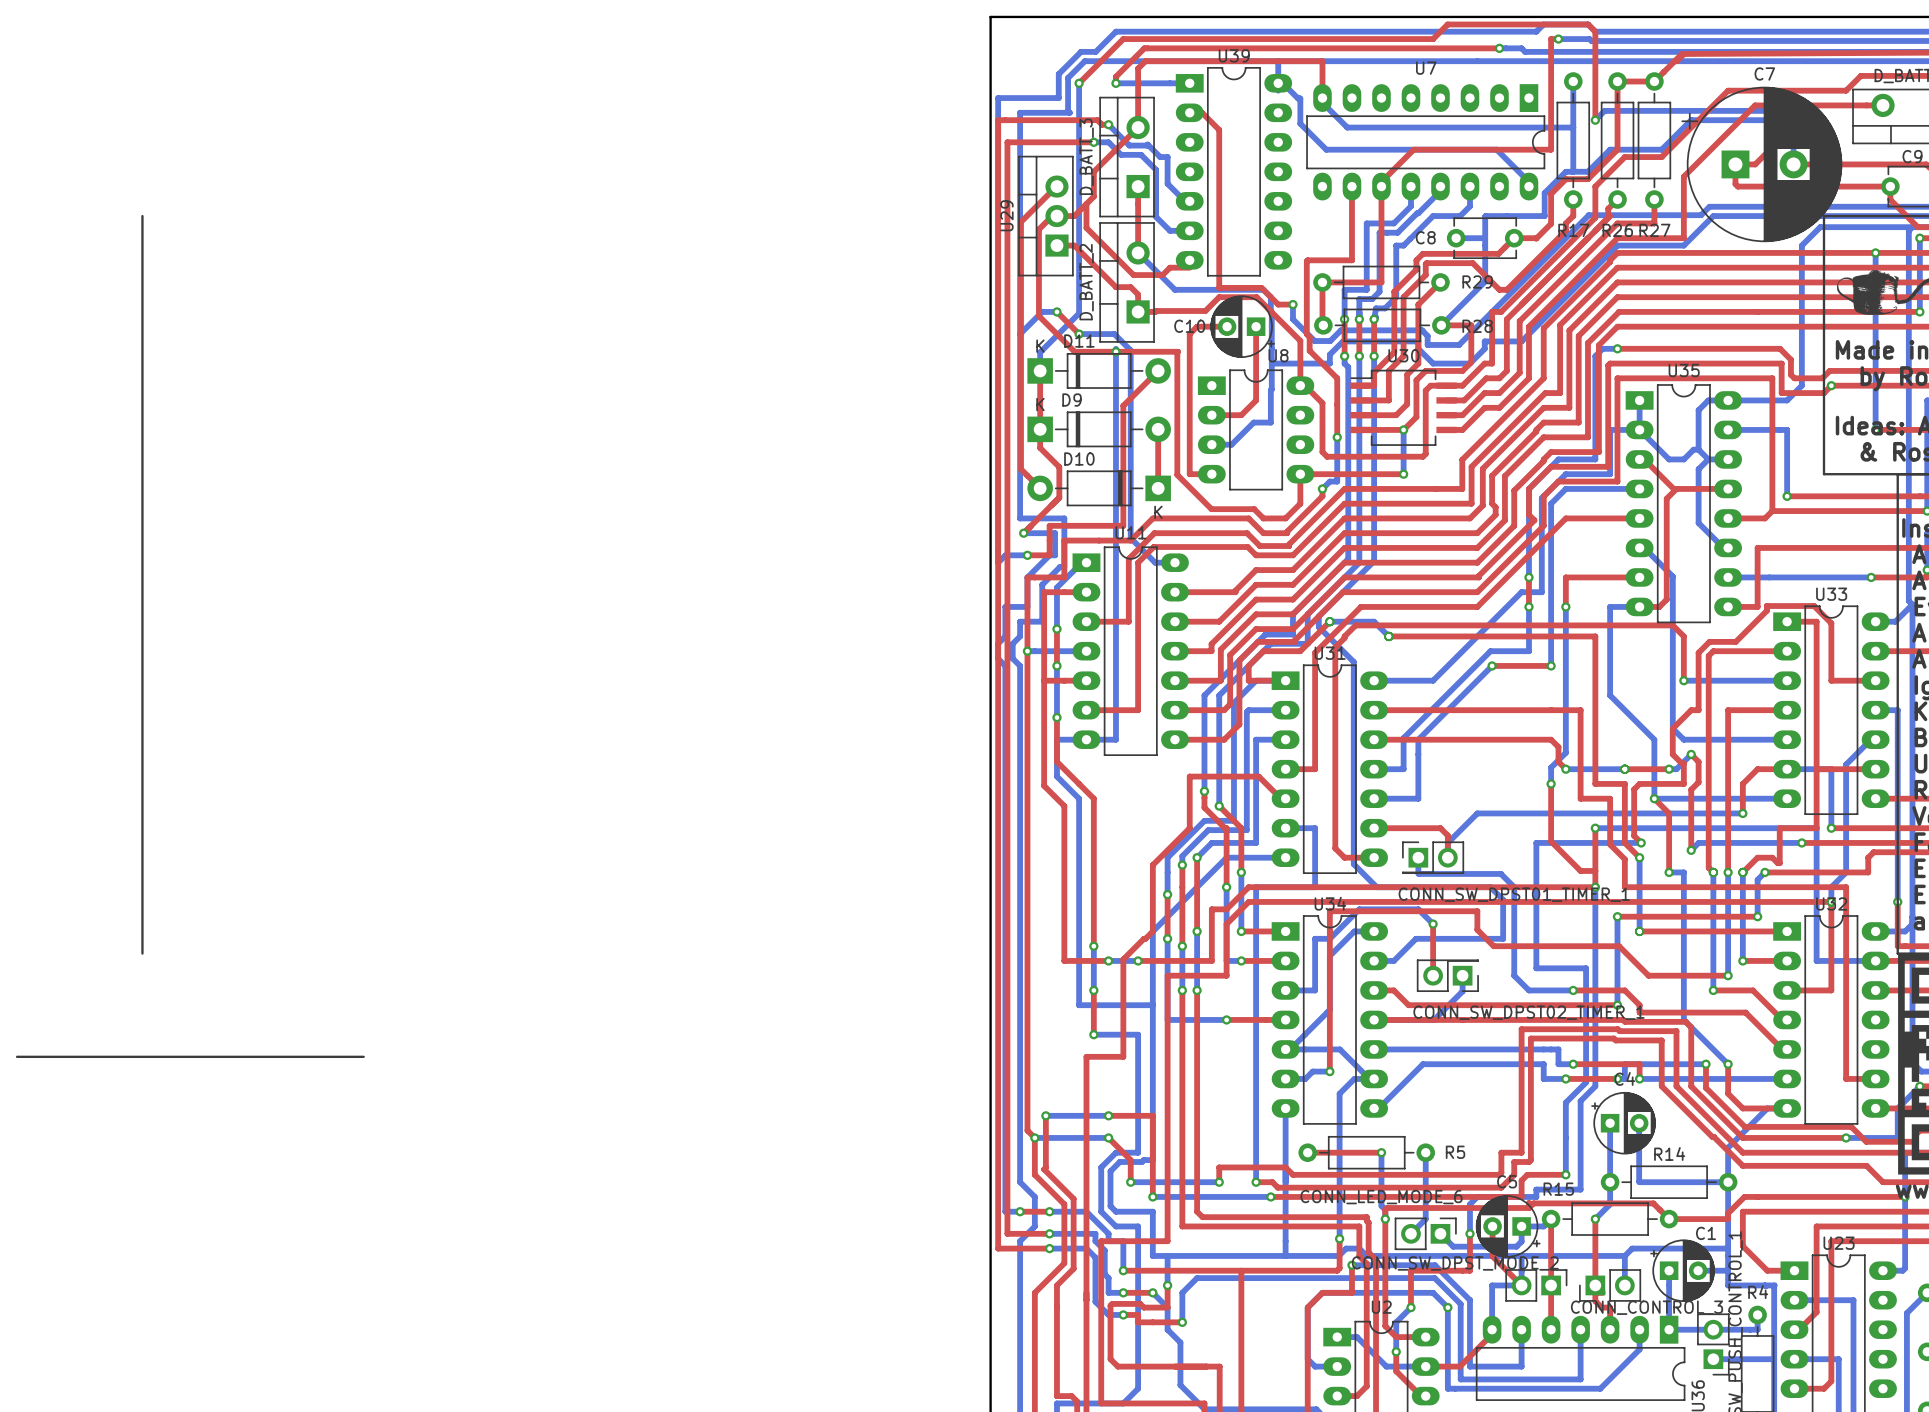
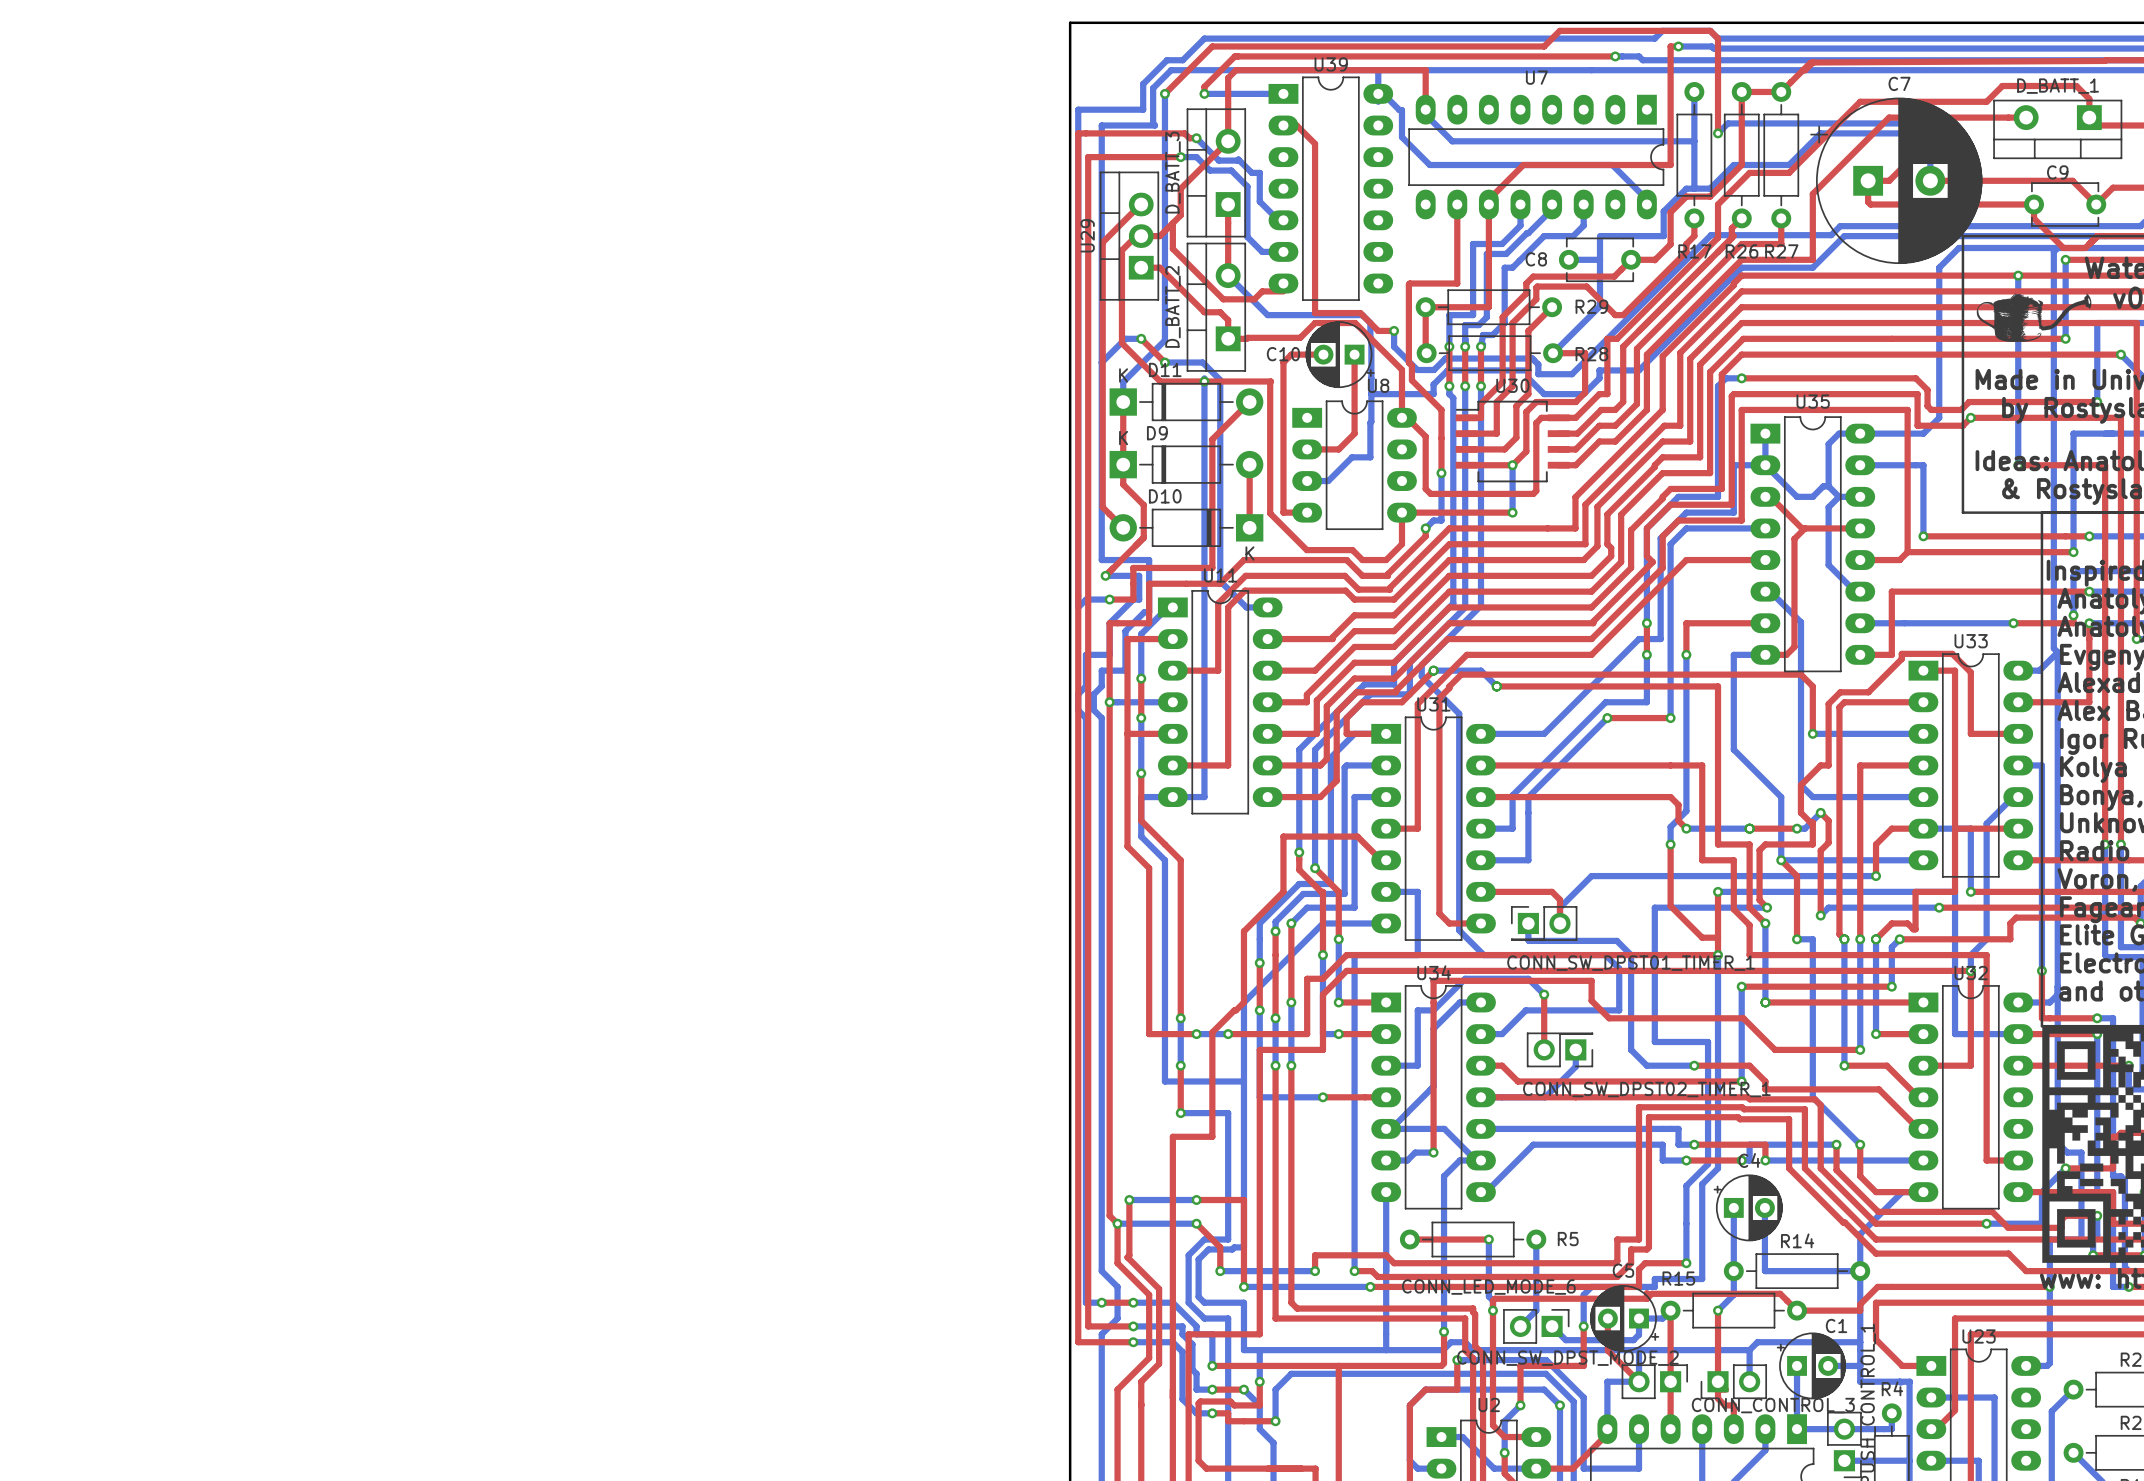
line: (142, 216) (142, 953) -> none
line: (17, 1056) (363, 1056) -> none

